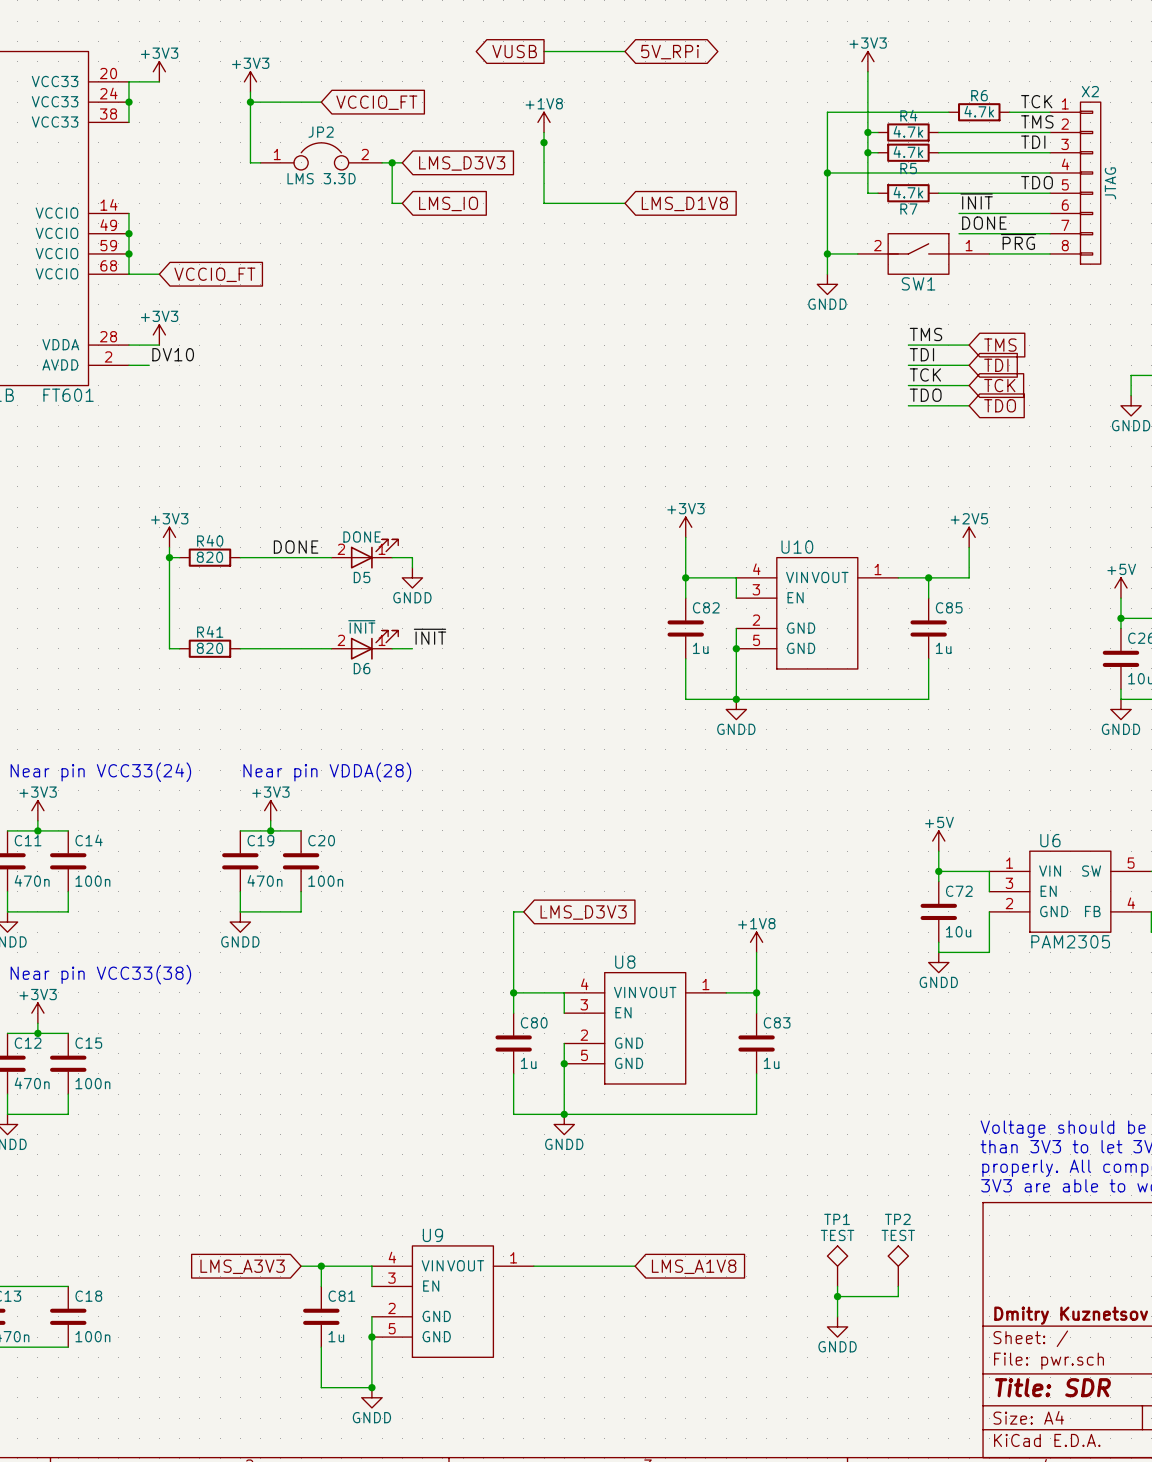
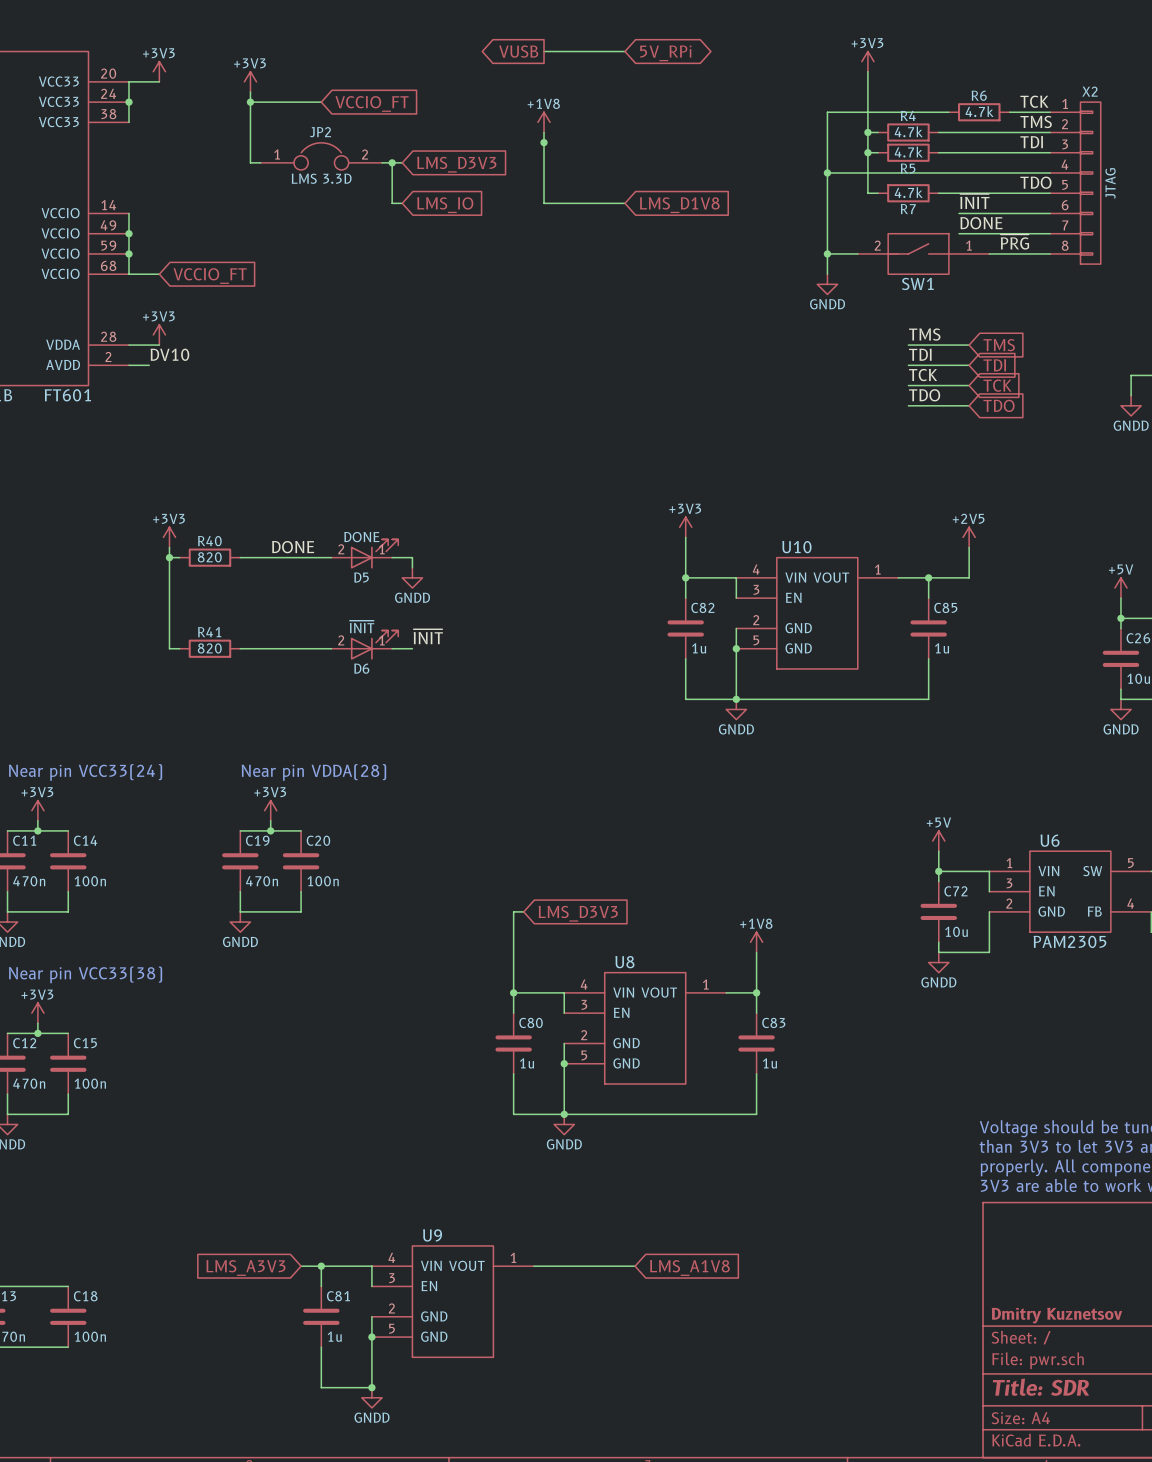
TP1: TEST (837, 1266) -> none
TP2: TEST (898, 1266) -> none
wire: (837, 1286) (837, 1316) -> none
wire: (898, 1286) (898, 1296) (837, 1296) -> none
junction: (837, 1296) -> none
power symbol: GNDD (837, 1326) -> none

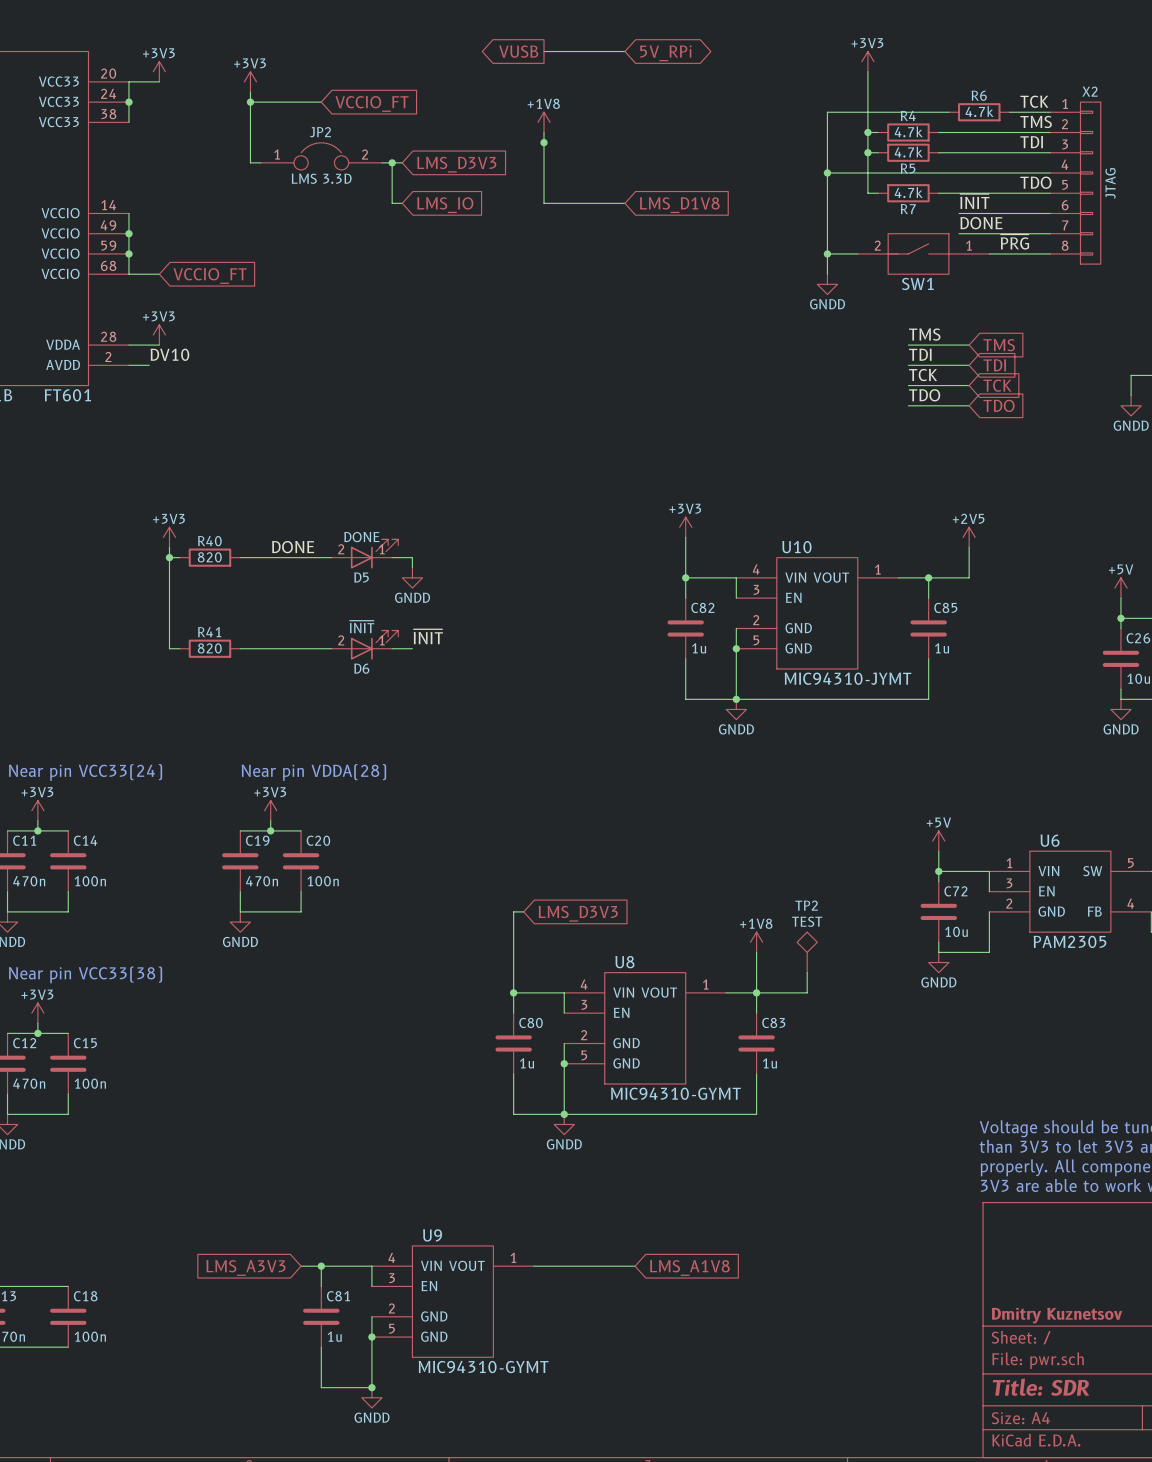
U10 text: none -> MIC94310-JYMT (848, 678)
TP2: none -> TEST (807, 952)
wire: none -> (807, 972) (807, 992) (756, 992)
U8 text: none -> MIC94310-GYMT (675, 1093)
U9 text: none -> MIC94310-GYMT (483, 1367)

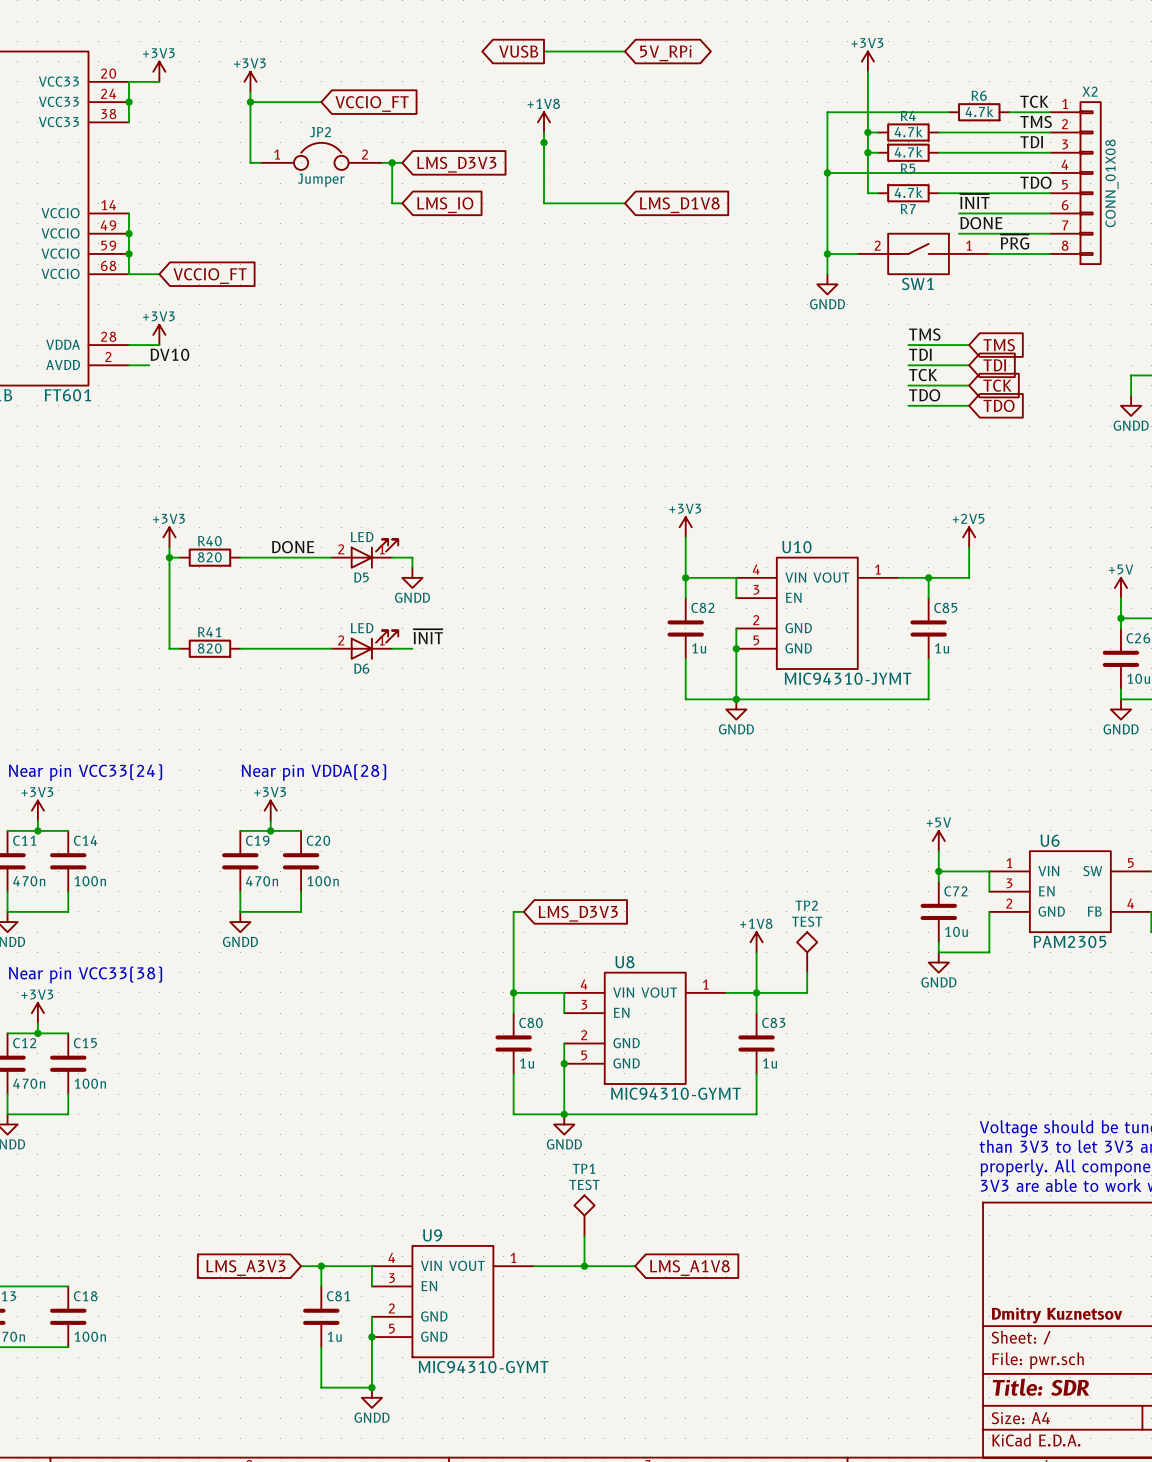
JP2 value: LMS 3.3D (321, 178) -> Jumper (321, 180)
X2 value: JTAG (1110, 183) -> CONN_01X08 (1111, 183)
D5 value: DONE (361, 537) -> LED (362, 537)
D6 value: ~{INIT} (362, 626) -> LED (362, 628)
TP1: none -> TEST (584, 1215)
wire: none -> (584, 1235) (584, 1266)
junction: none -> (584, 1266)

